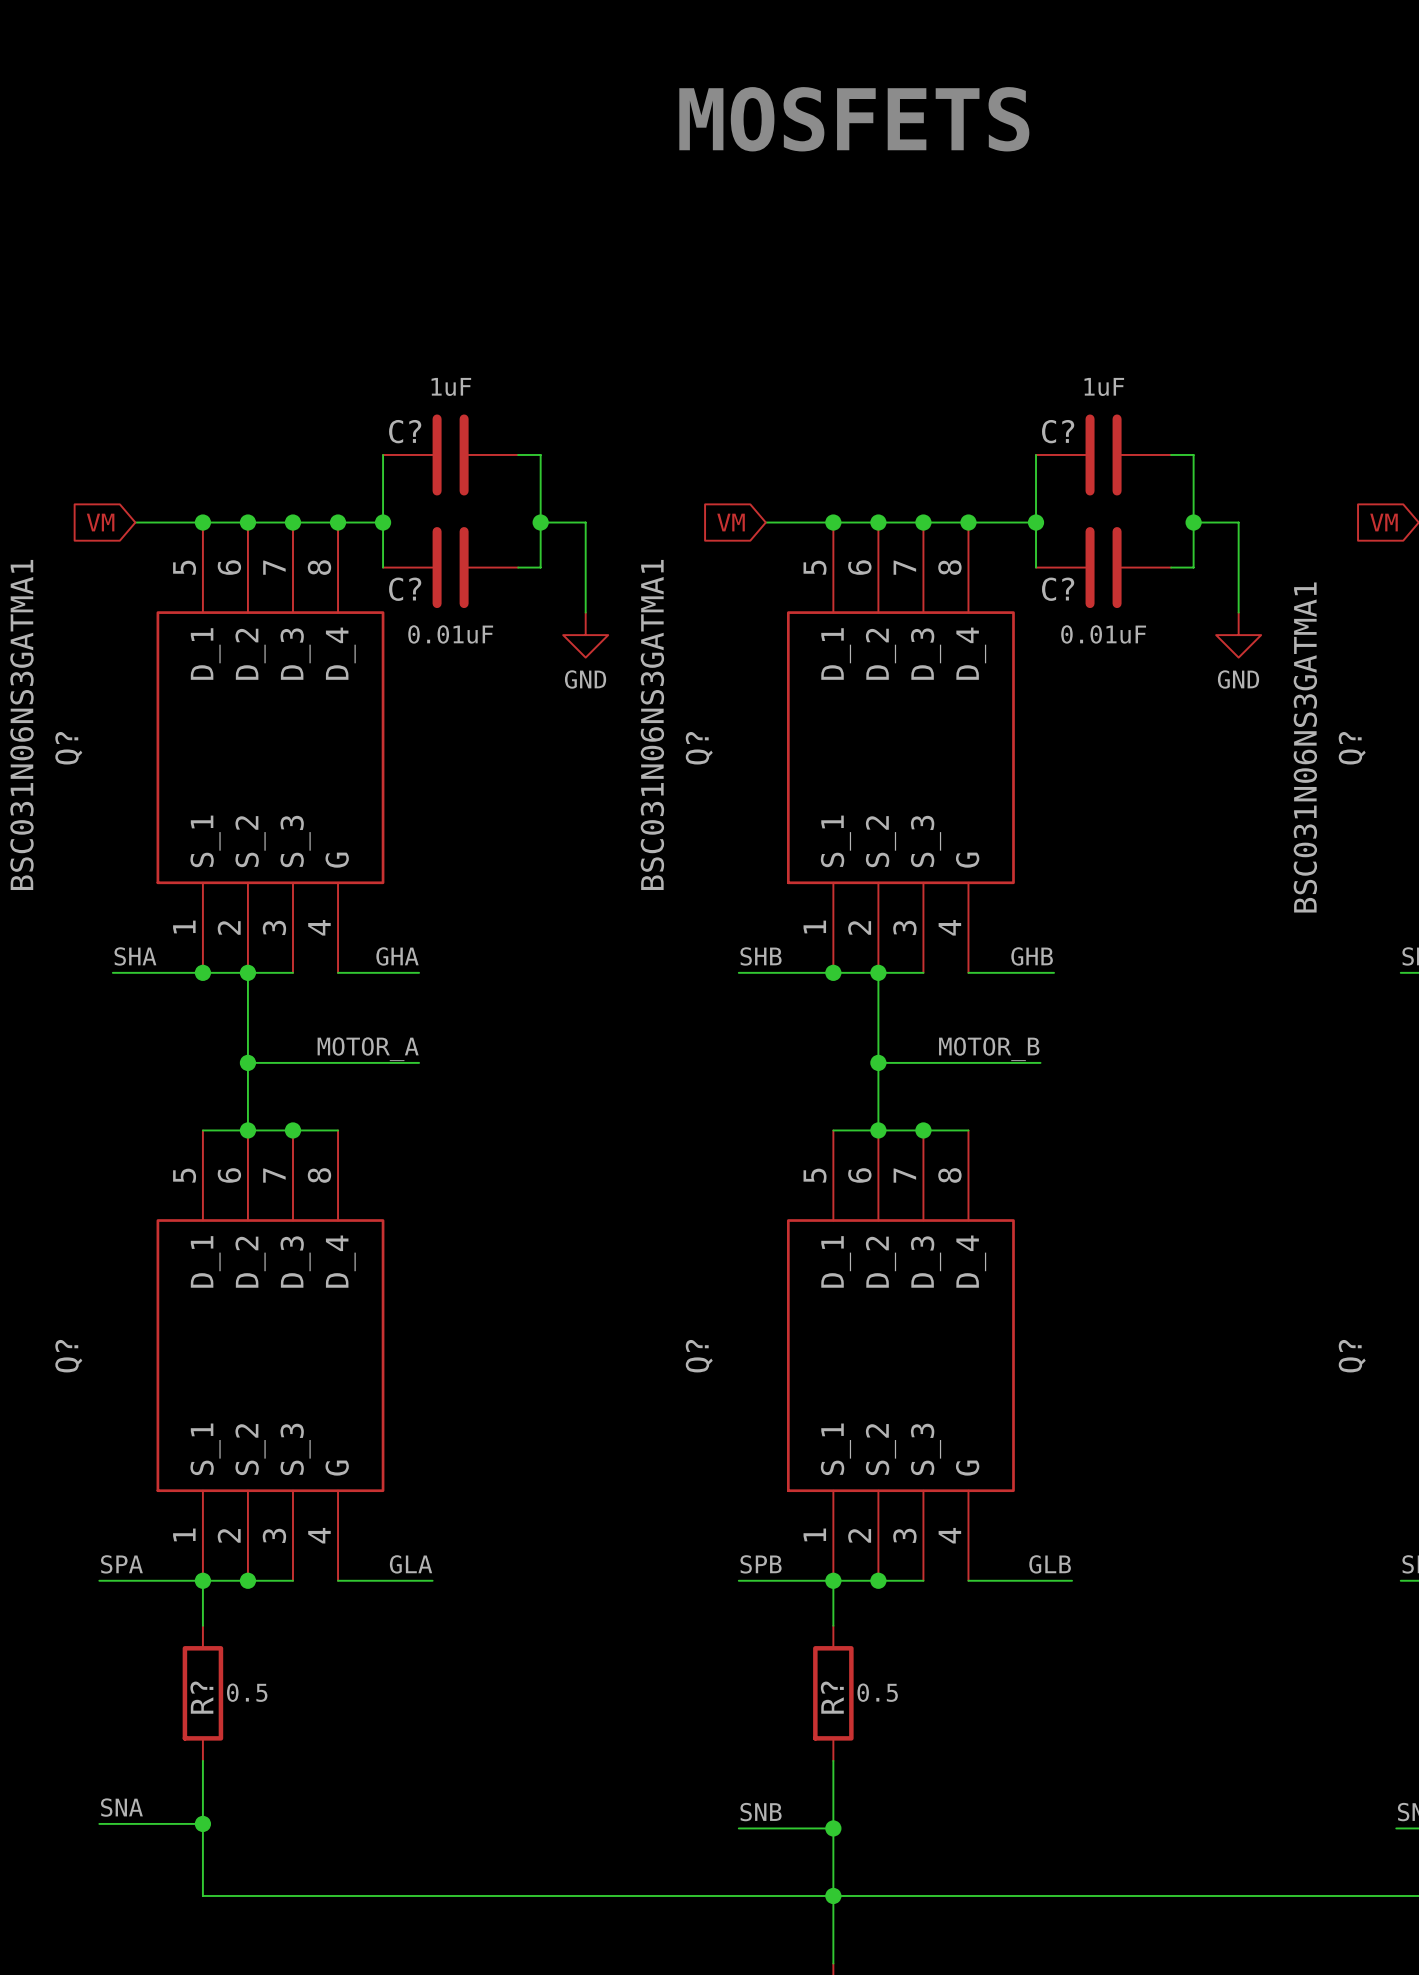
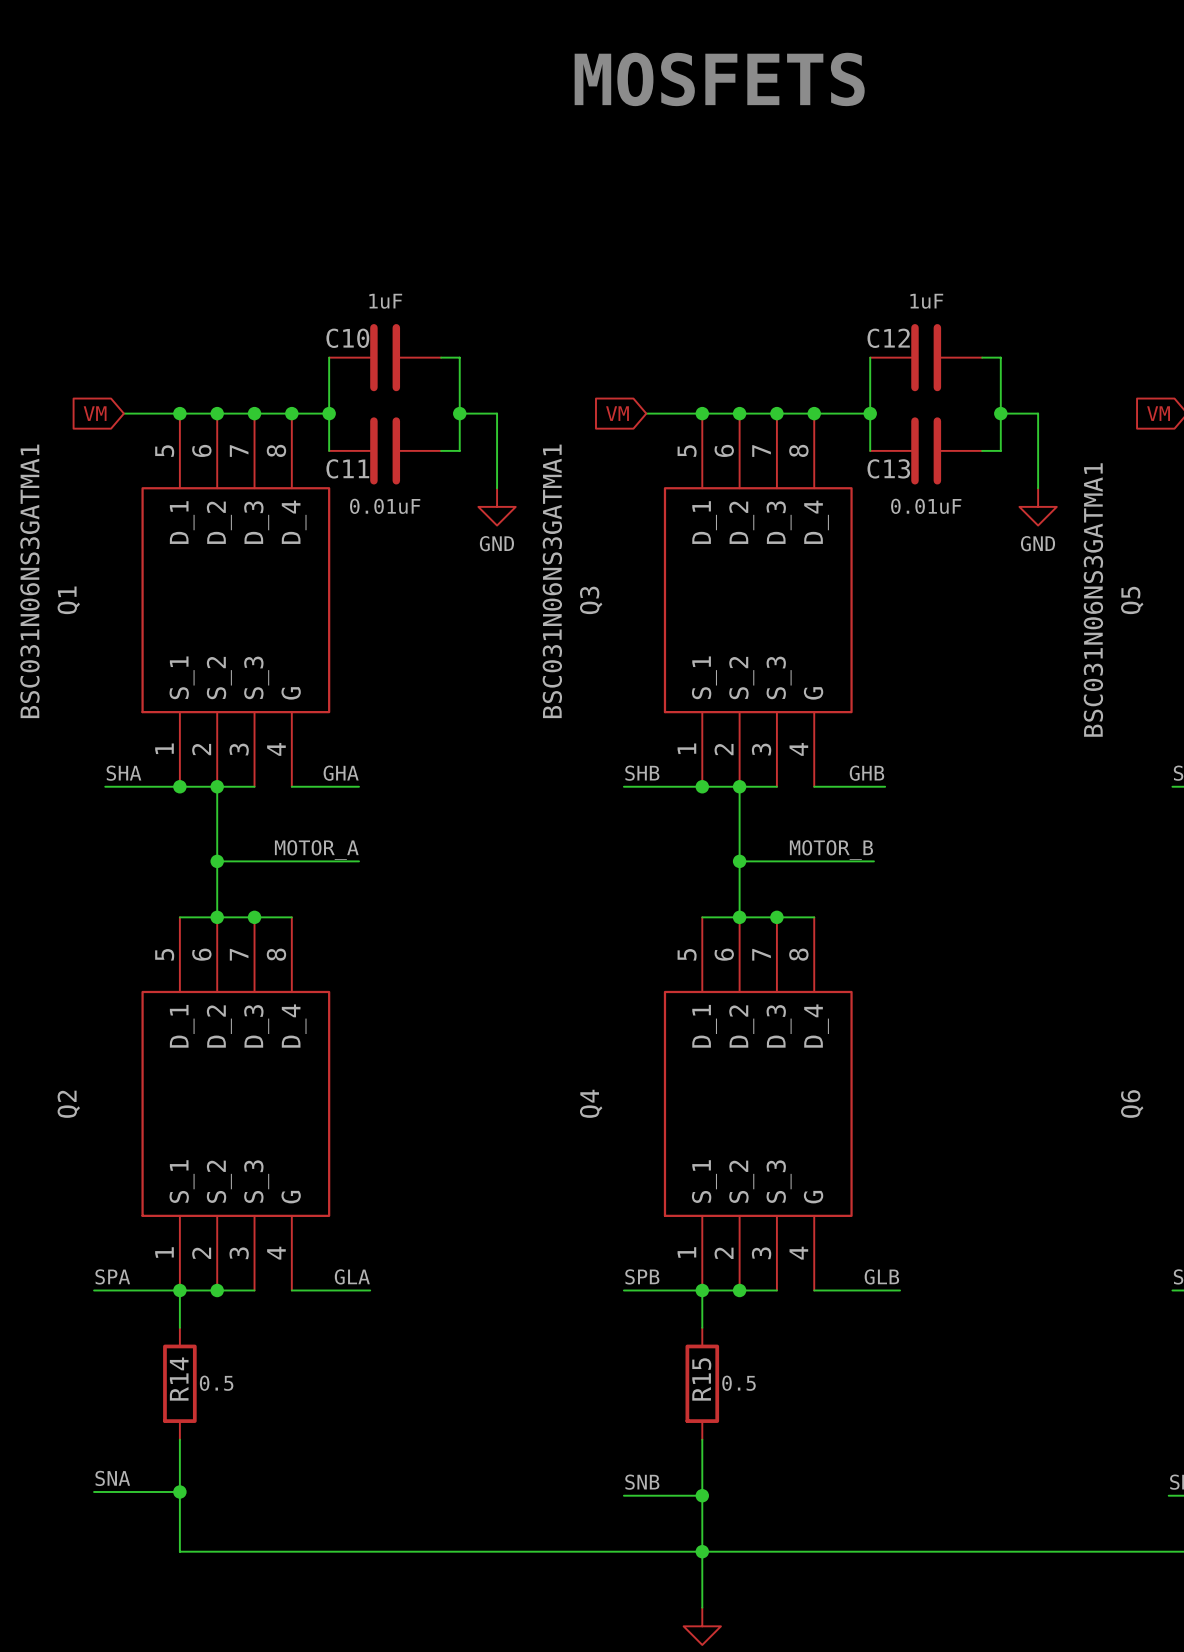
C? name: C? (405, 431) -> C10 (347, 338)
C? name: C? (1058, 431) -> C12 (888, 338)
C? name: C? (405, 589) -> C11 (347, 468)
C? name: C? (1058, 589) -> C13 (888, 468)
Q? name: Q? (68, 748) -> Q1 (68, 600)
Q? name: Q? (699, 748) -> Q3 (591, 600)
Q? name: Q? (1352, 748) -> Q5 (1132, 600)
Q? name: Q? (68, 1356) -> Q2 (68, 1104)
Q? name: Q? (699, 1356) -> Q4 (591, 1103)
Q? name: Q? (1352, 1356) -> Q6 (1132, 1104)
R? name: R? (201, 1697) -> R14 (179, 1379)
R? name: R? (832, 1697) -> R15 (701, 1379)

